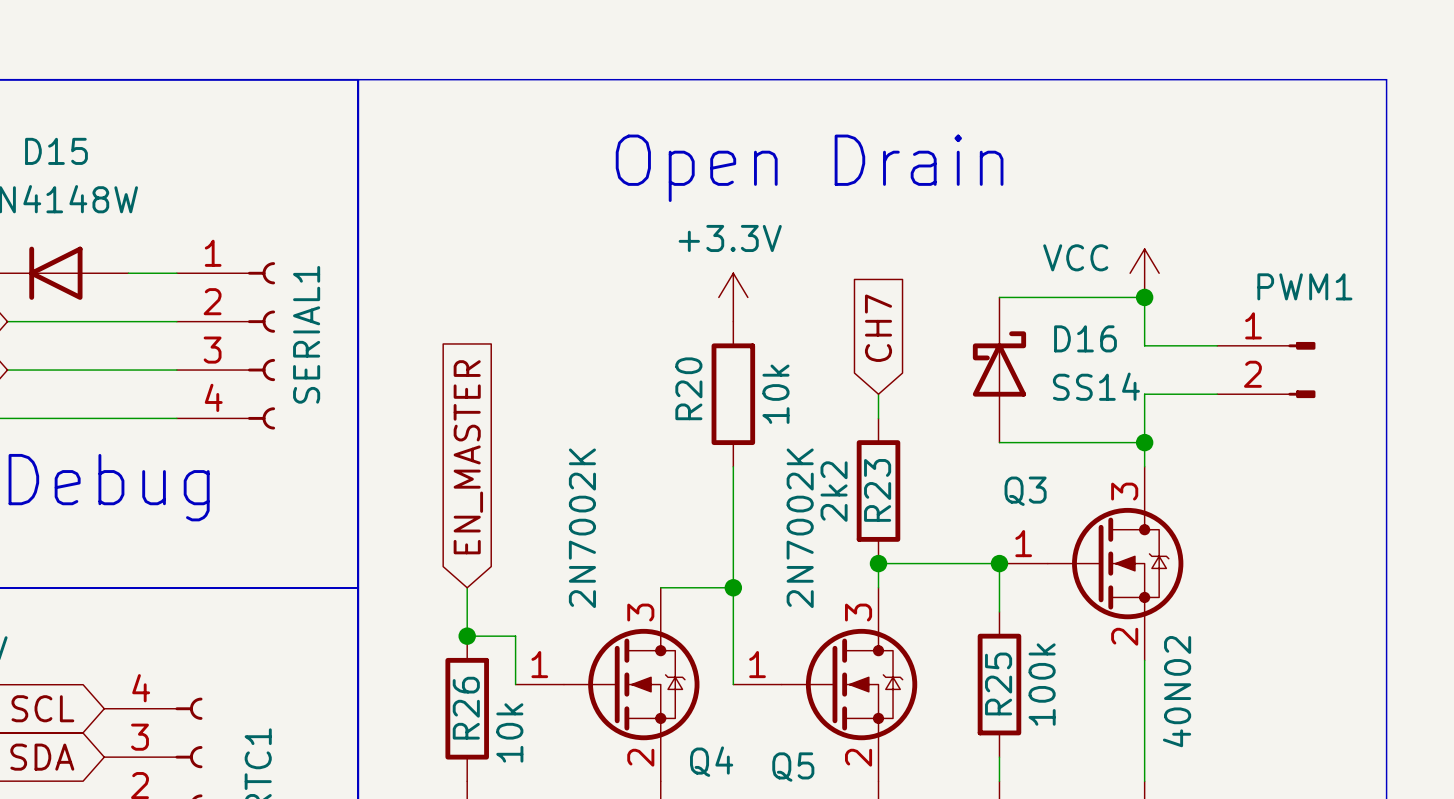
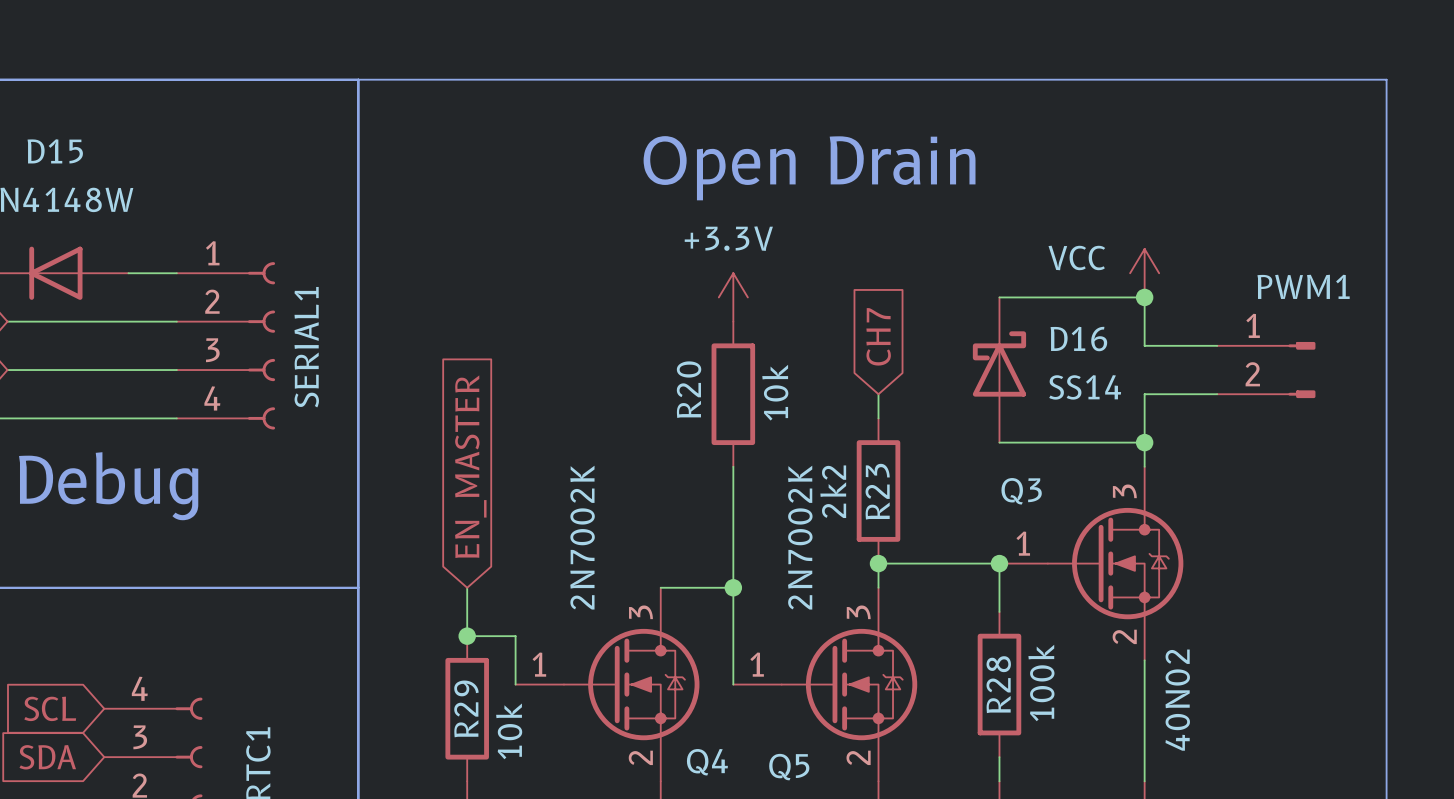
R25 name: R25 (998, 683) -> R28 (998, 684)
R26 name: R26 (466, 708) -> R29 (466, 708)

